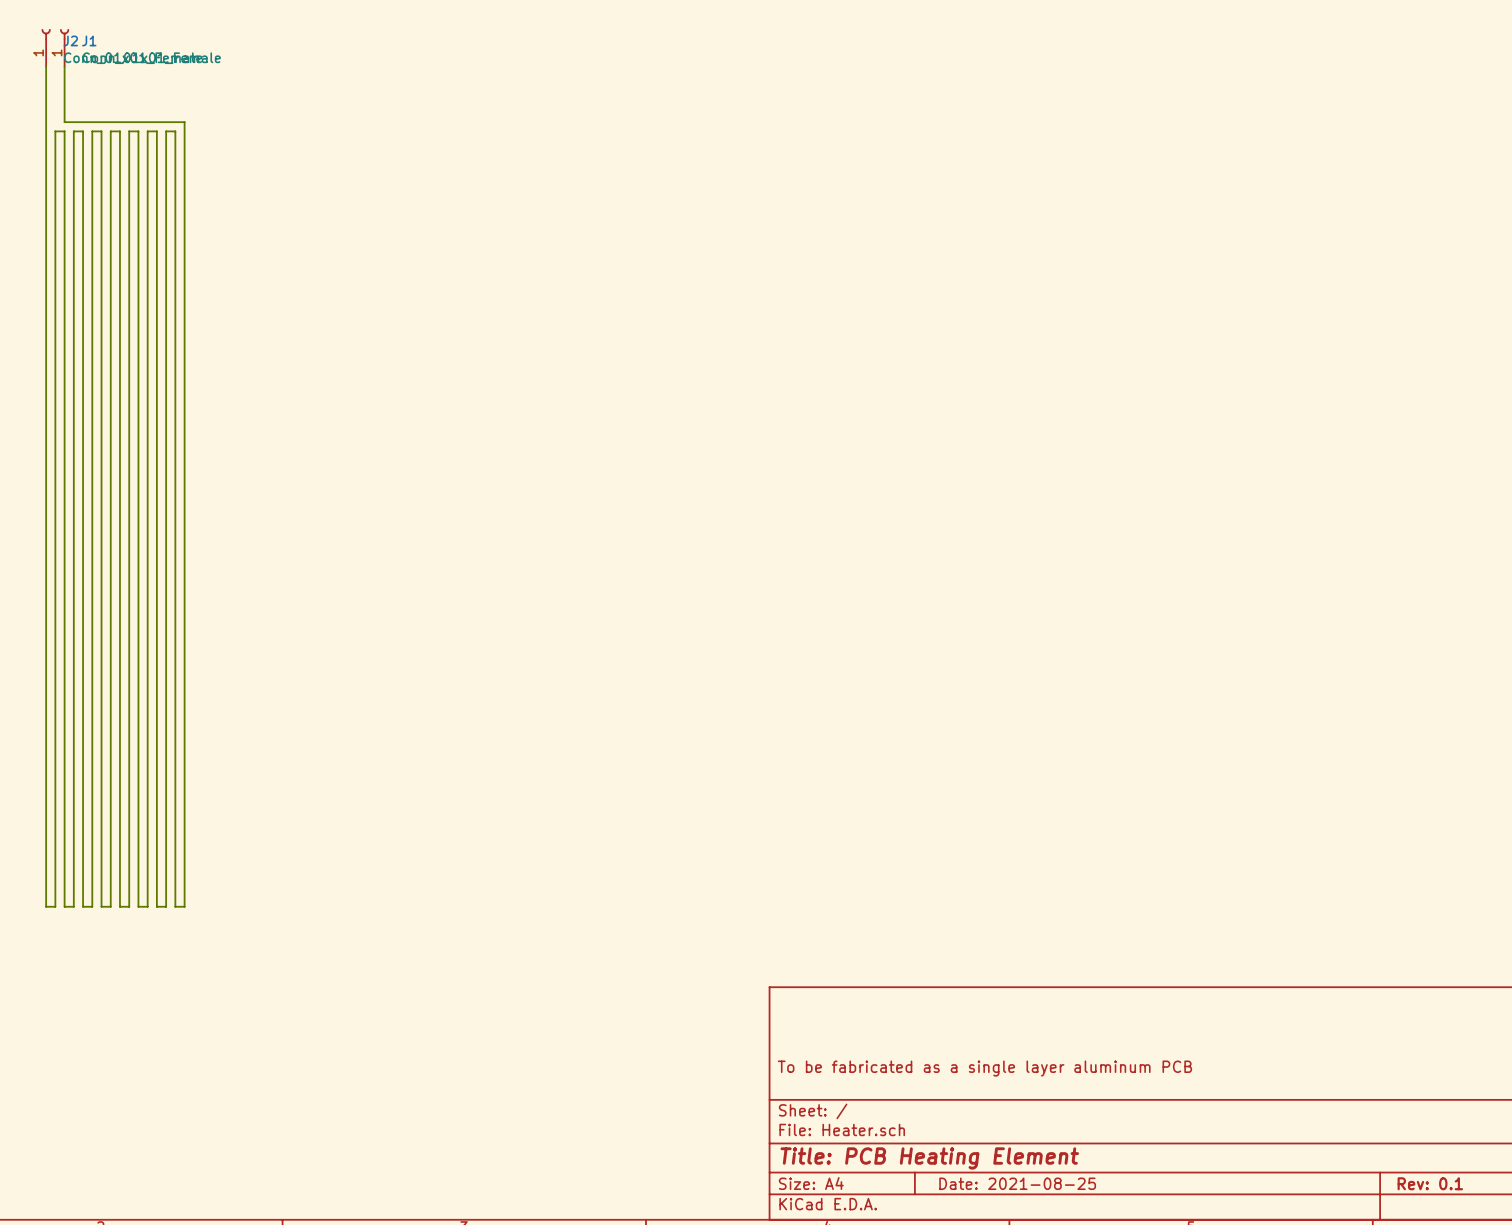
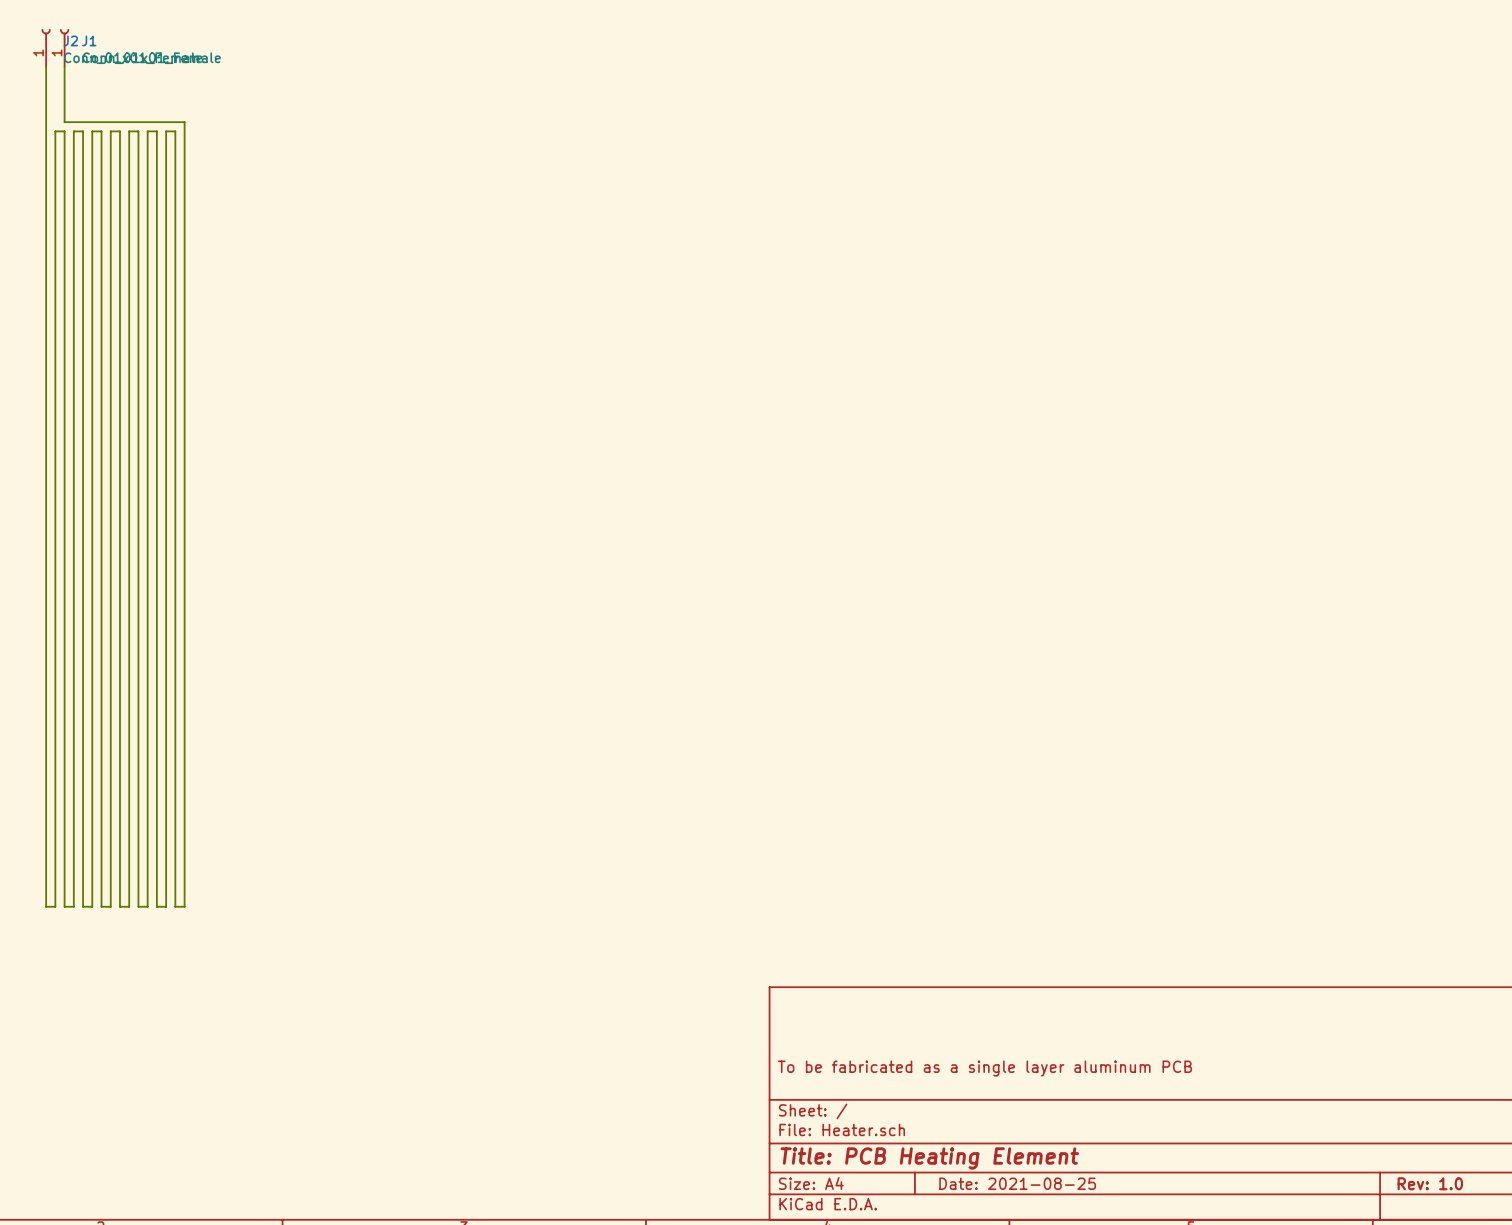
title block: Rev: 0.1 (1430, 1183) -> Rev: 1.0 (1430, 1183)

